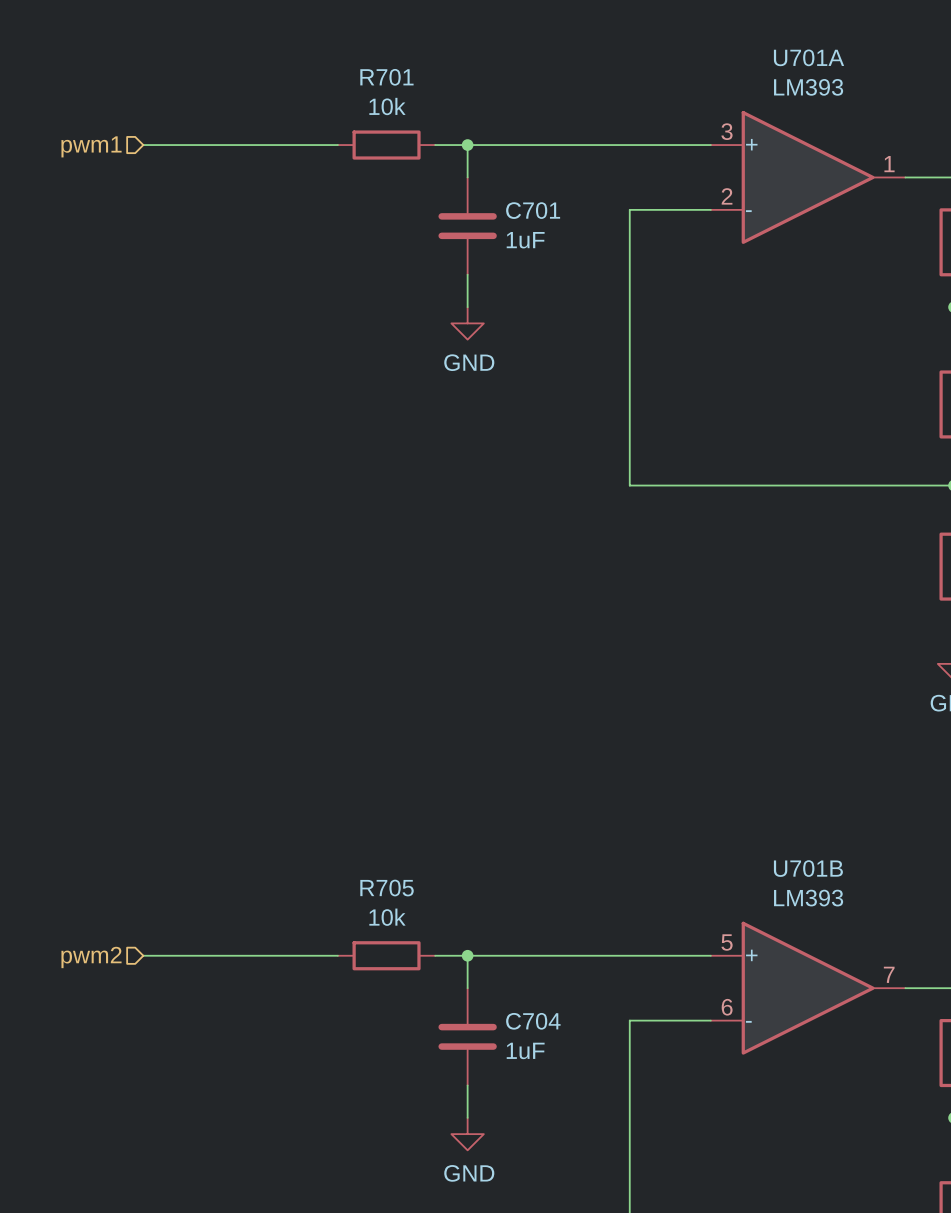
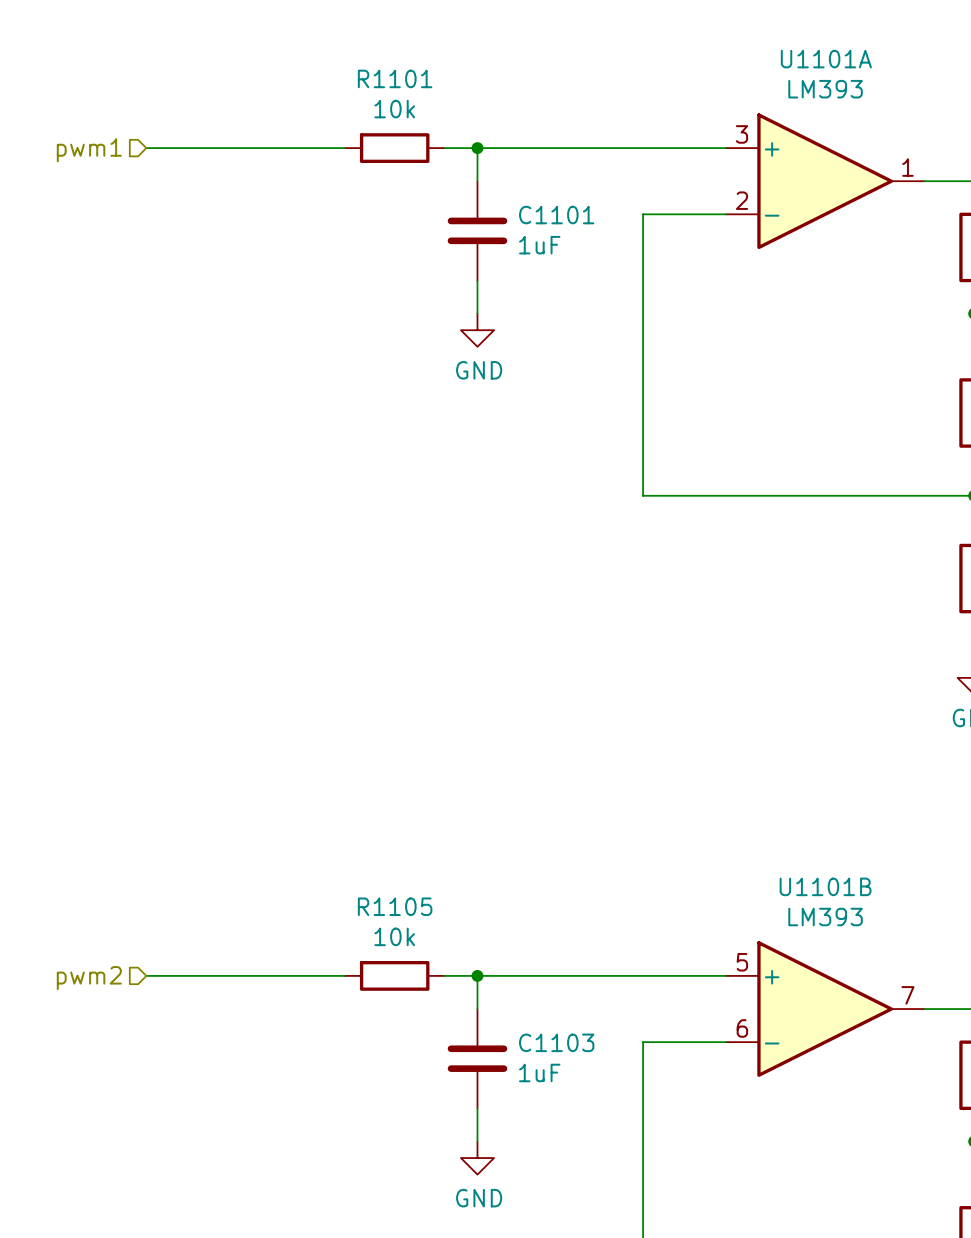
U701A name: U701A (809, 57) -> U1101A (826, 59)
R701 name: R701 (386, 77) -> R1101 (395, 78)
C701 name: C701 (533, 210) -> C1101 (556, 215)
U701B name: U701B (808, 868) -> U1101B (825, 886)
R705 name: R705 (387, 888) -> R1105 (395, 906)
C704 name: C704 (533, 1021) -> C1103 (556, 1042)

